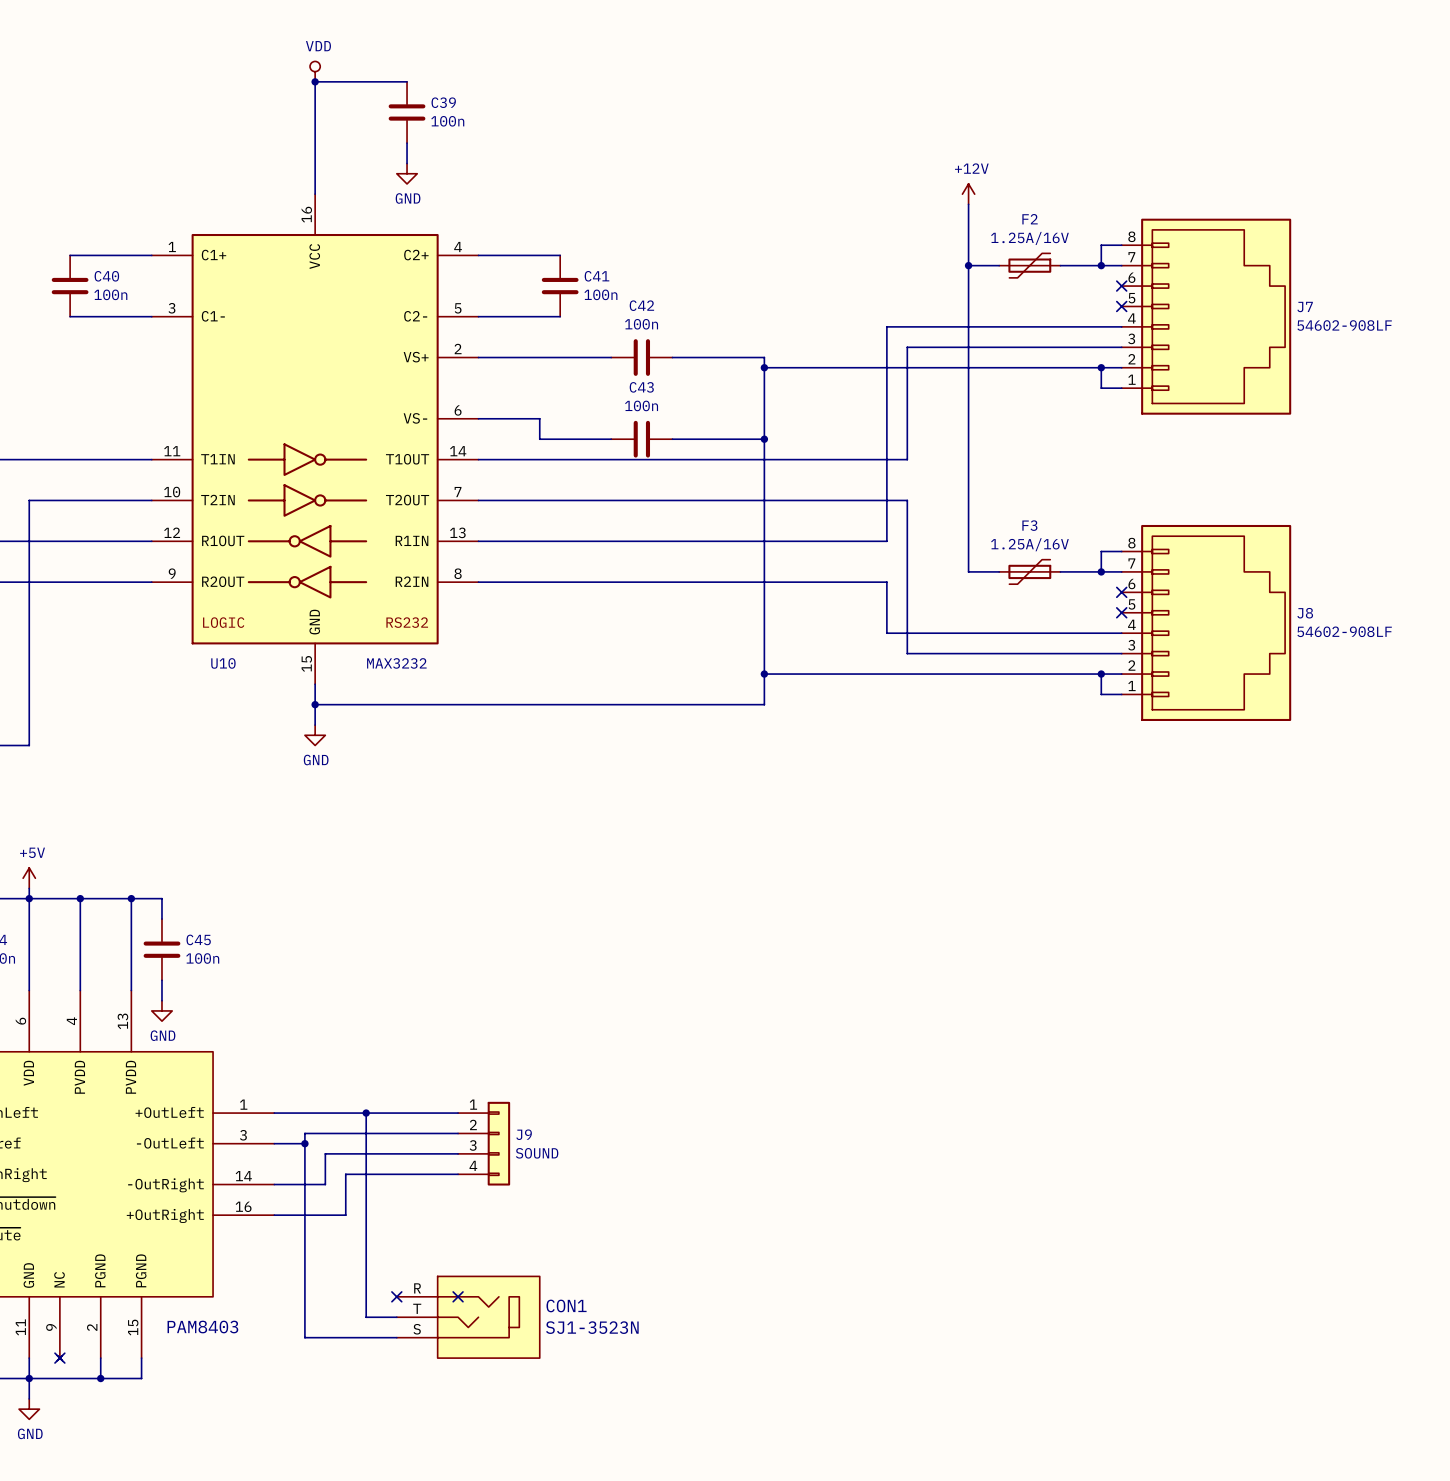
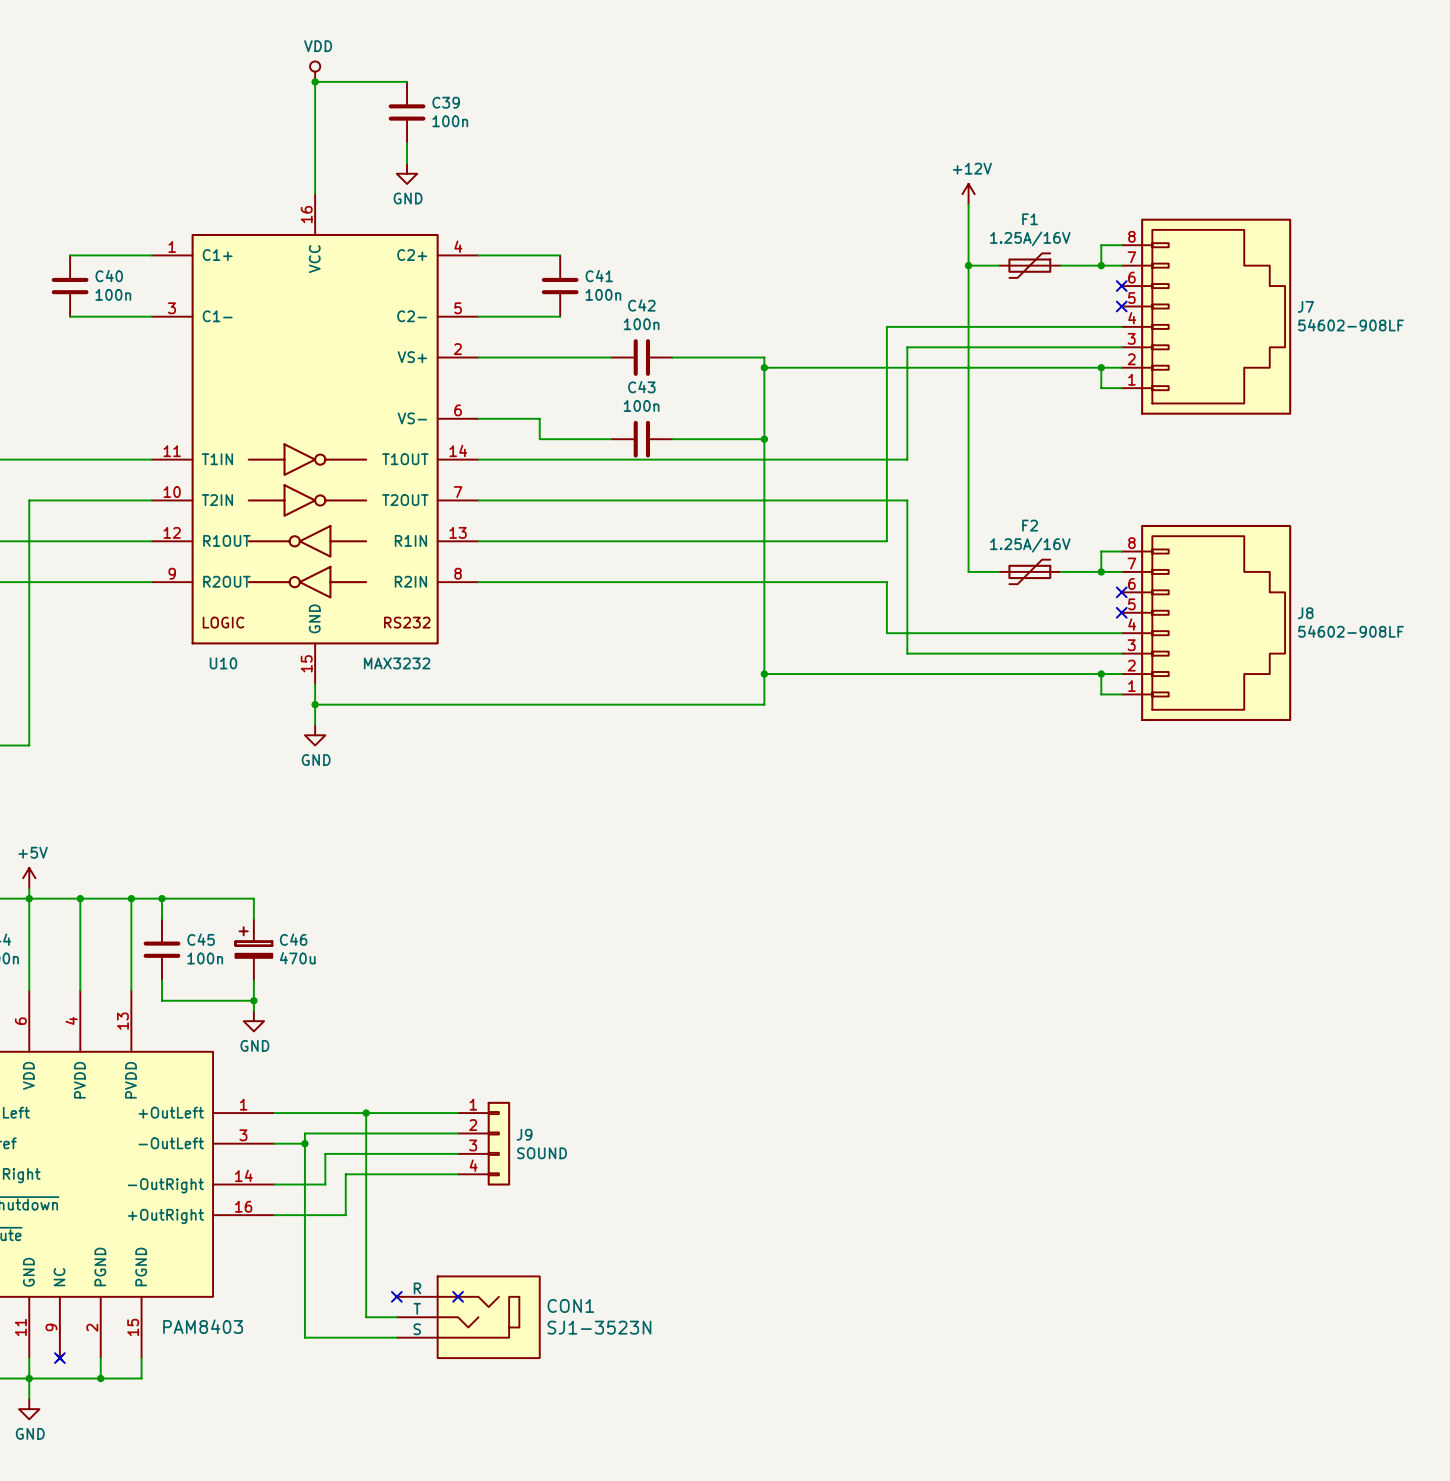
F2 name: F2 (1030, 219) -> F1 (1030, 219)
F3 name: F3 (1029, 525) -> F2 (1030, 525)
wire: none -> (161, 898) (253, 898) (253, 919)
junction: none -> (161, 898)
C46: none -> 470u (253, 949)
wire: none -> (253, 980) (253, 1010)
wire: none -> (161, 1000) (253, 1000)
junction: none -> (253, 1000)
power symbol position: GND (161, 1010) -> GND (253, 1021)

